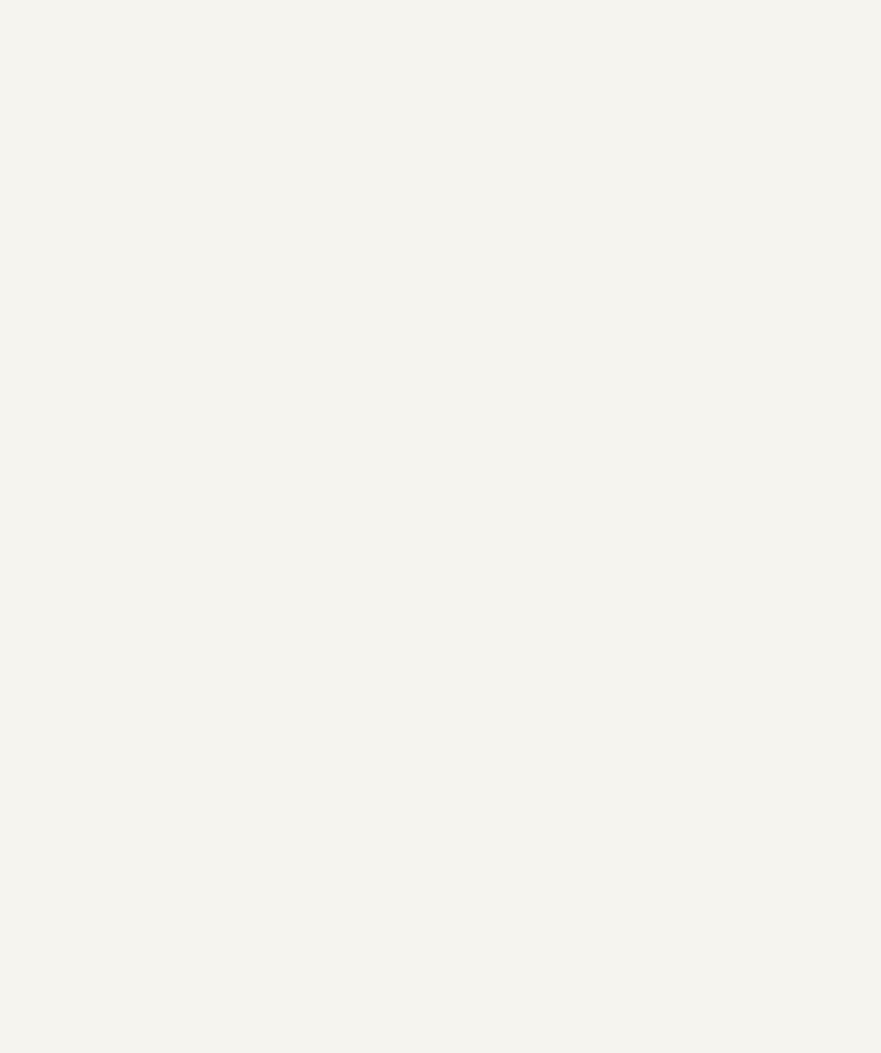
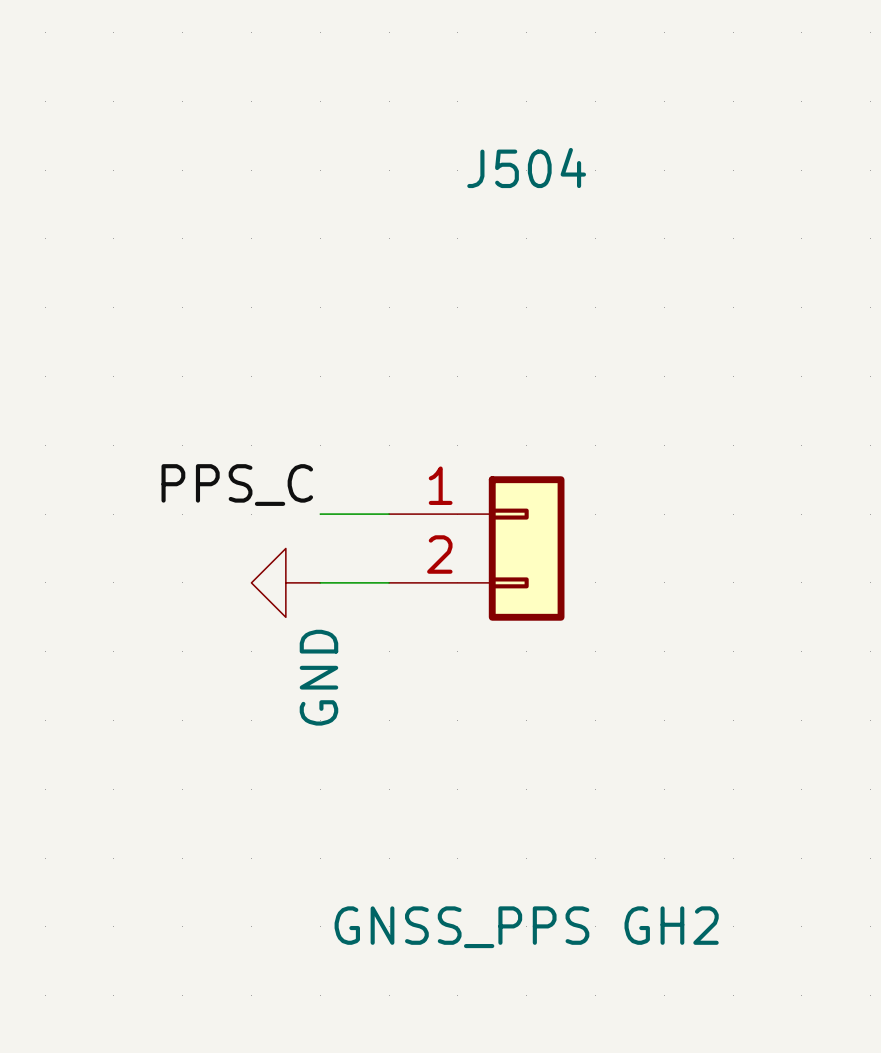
label: none -> PPS_C (237, 485)
wire: none -> (320, 514) (389, 514)
J504: none -> GNSS_PPS GH2 (476, 548)
power symbol: none -> GND (285, 582)
wire: none -> (320, 582) (389, 582)

